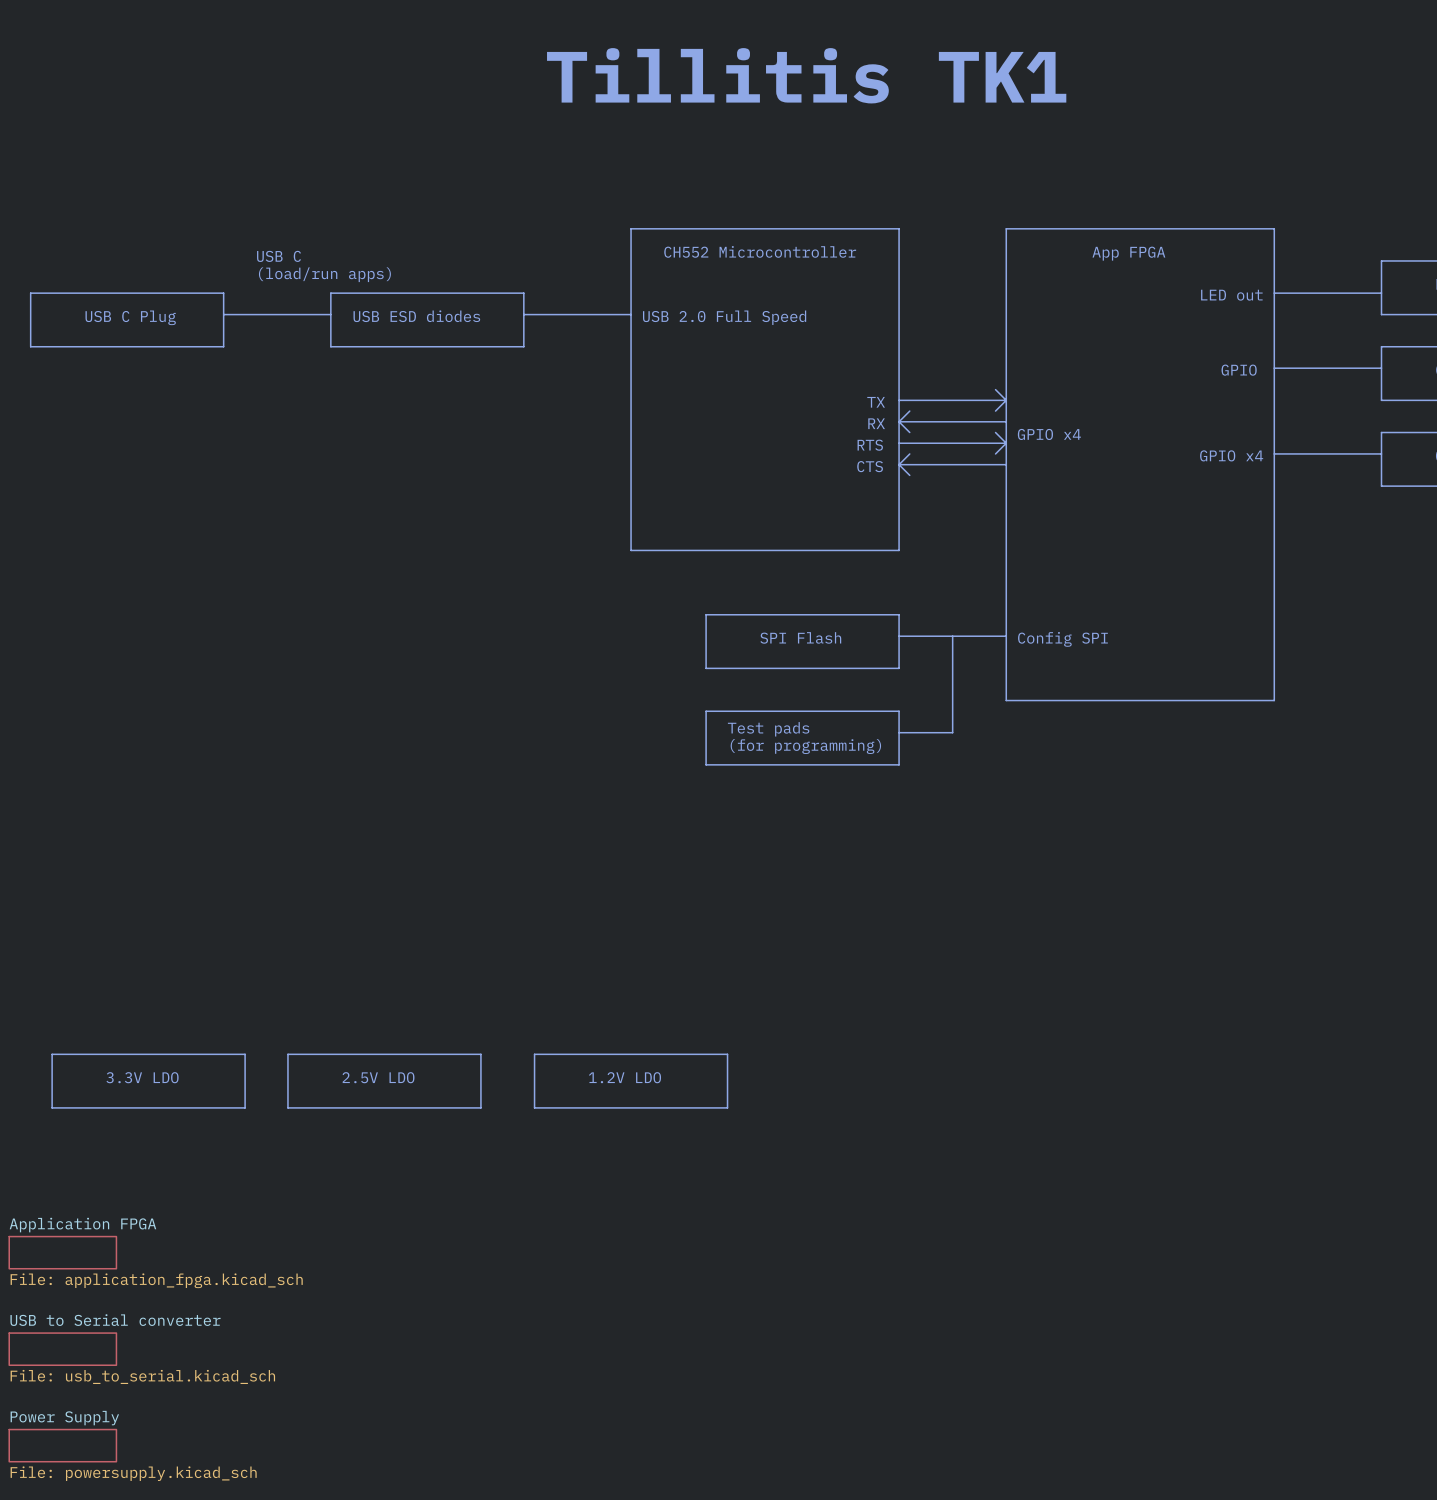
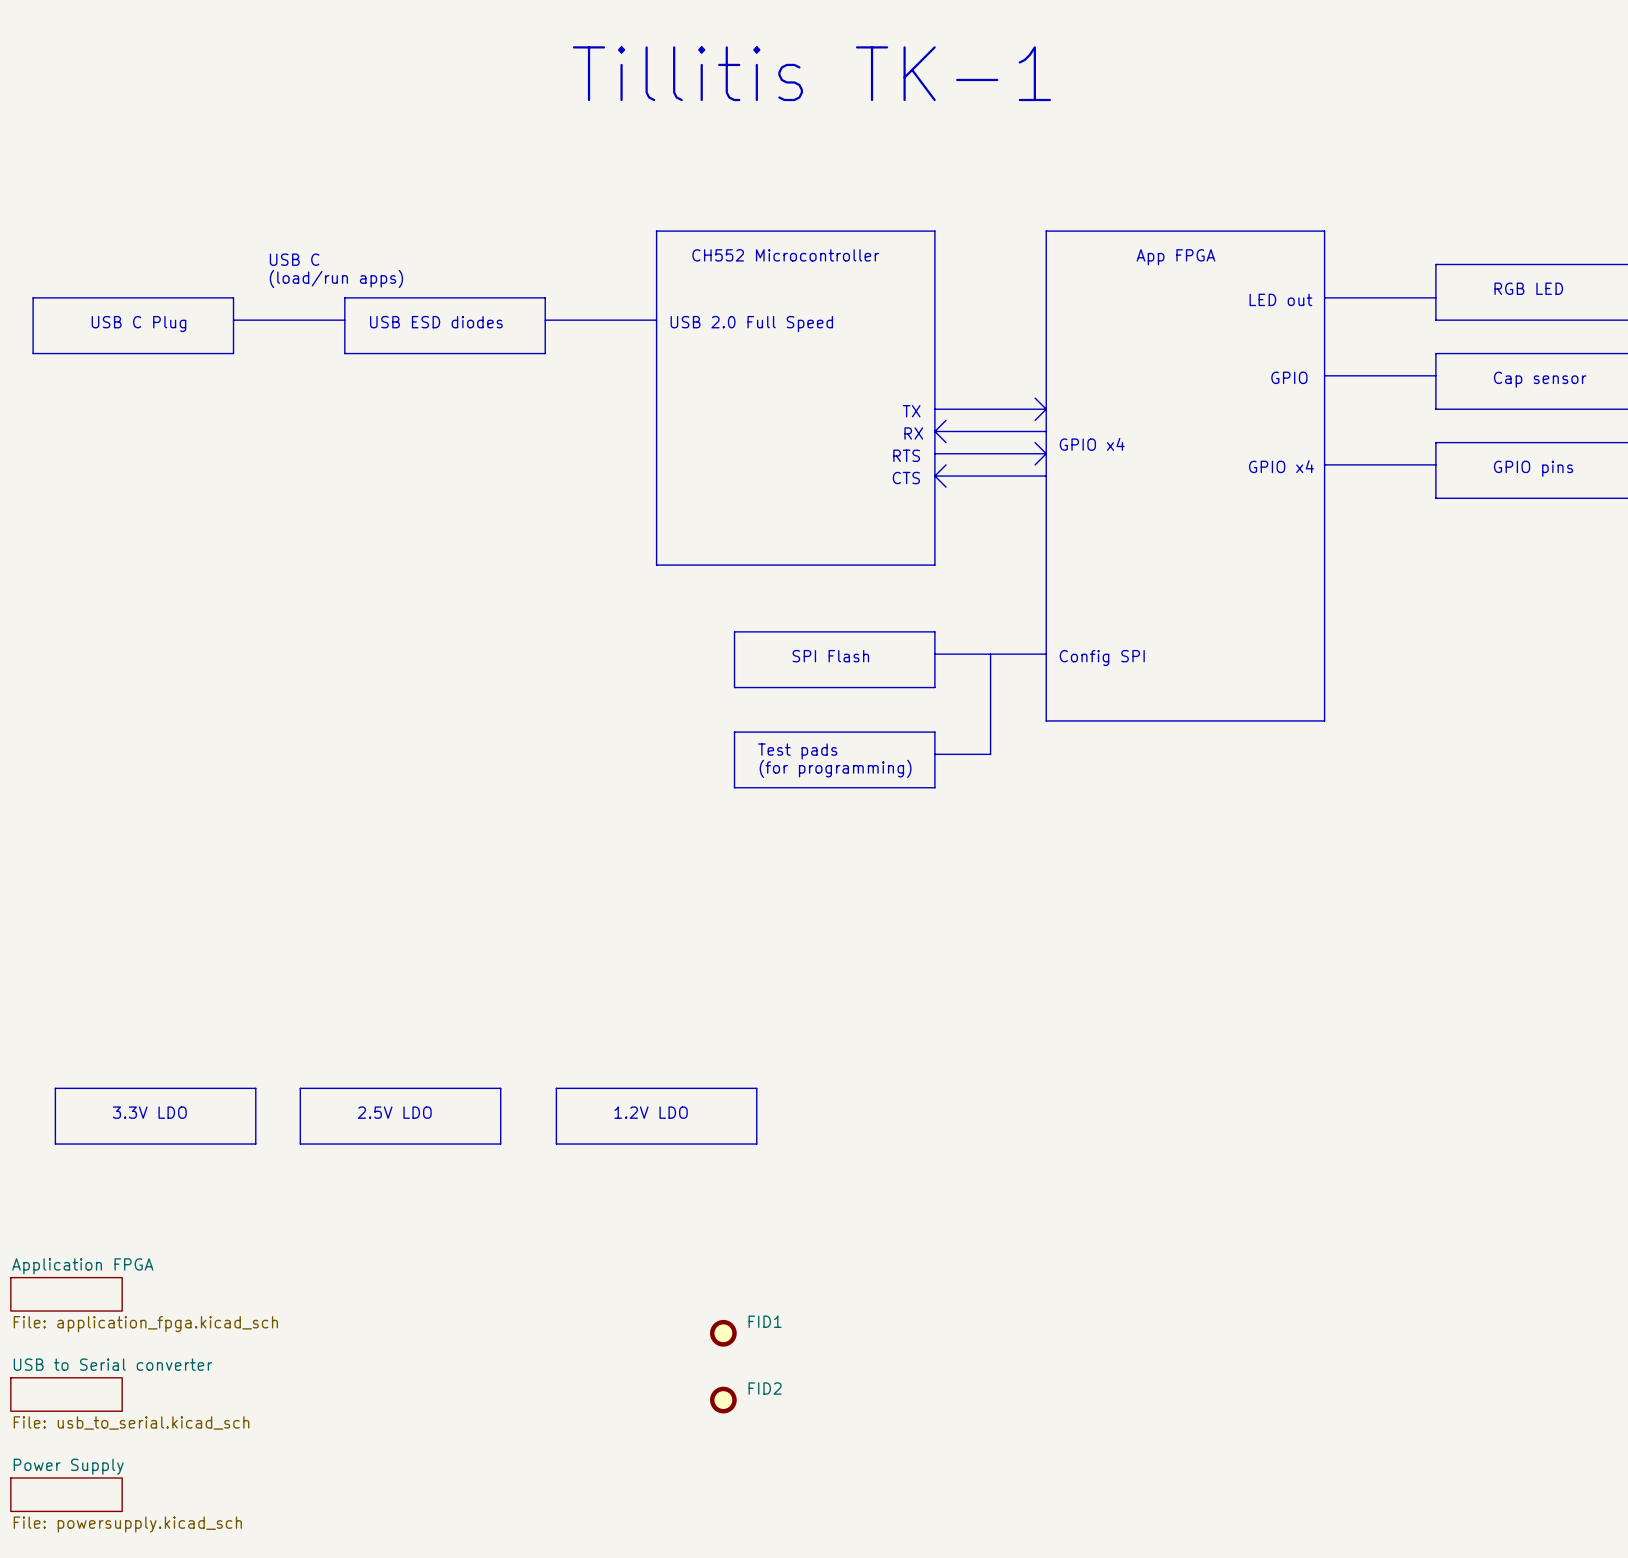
text: Tillitis TK1 (806, 75) -> Tillitis TK-1 (811, 73)
FID1: none -> (723, 1333)
FID2: none -> (723, 1400)

